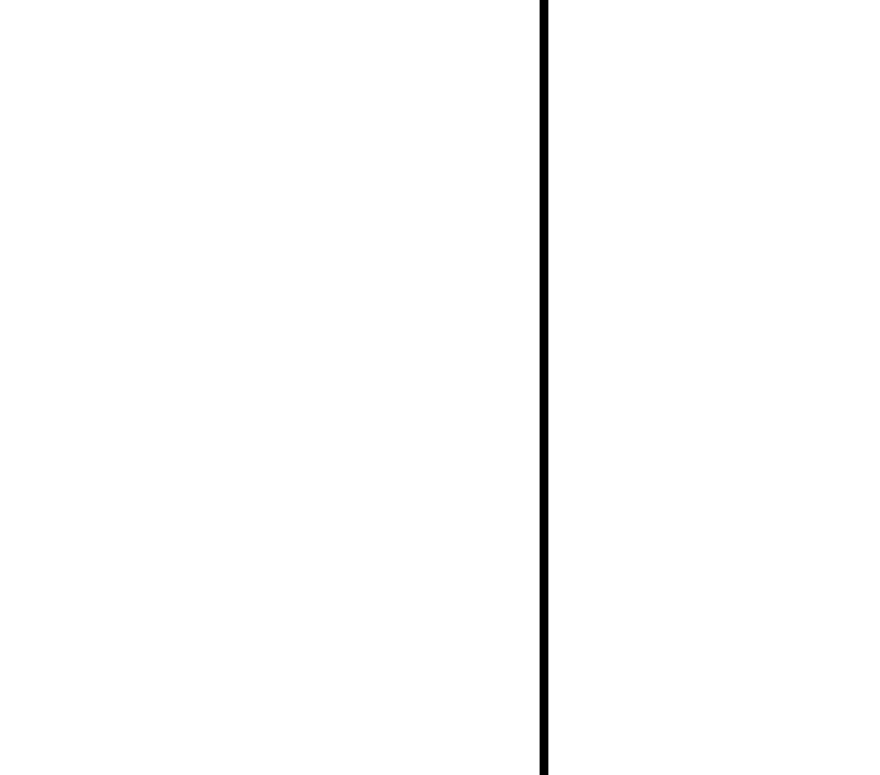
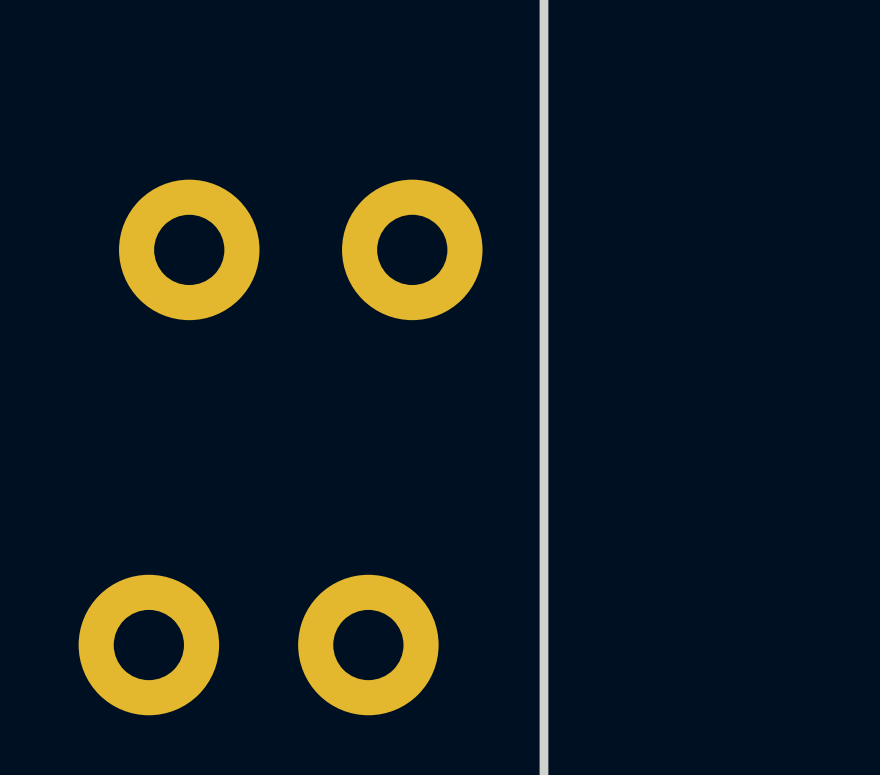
part: none -> (300, 249)
part: none -> (258, 645)

